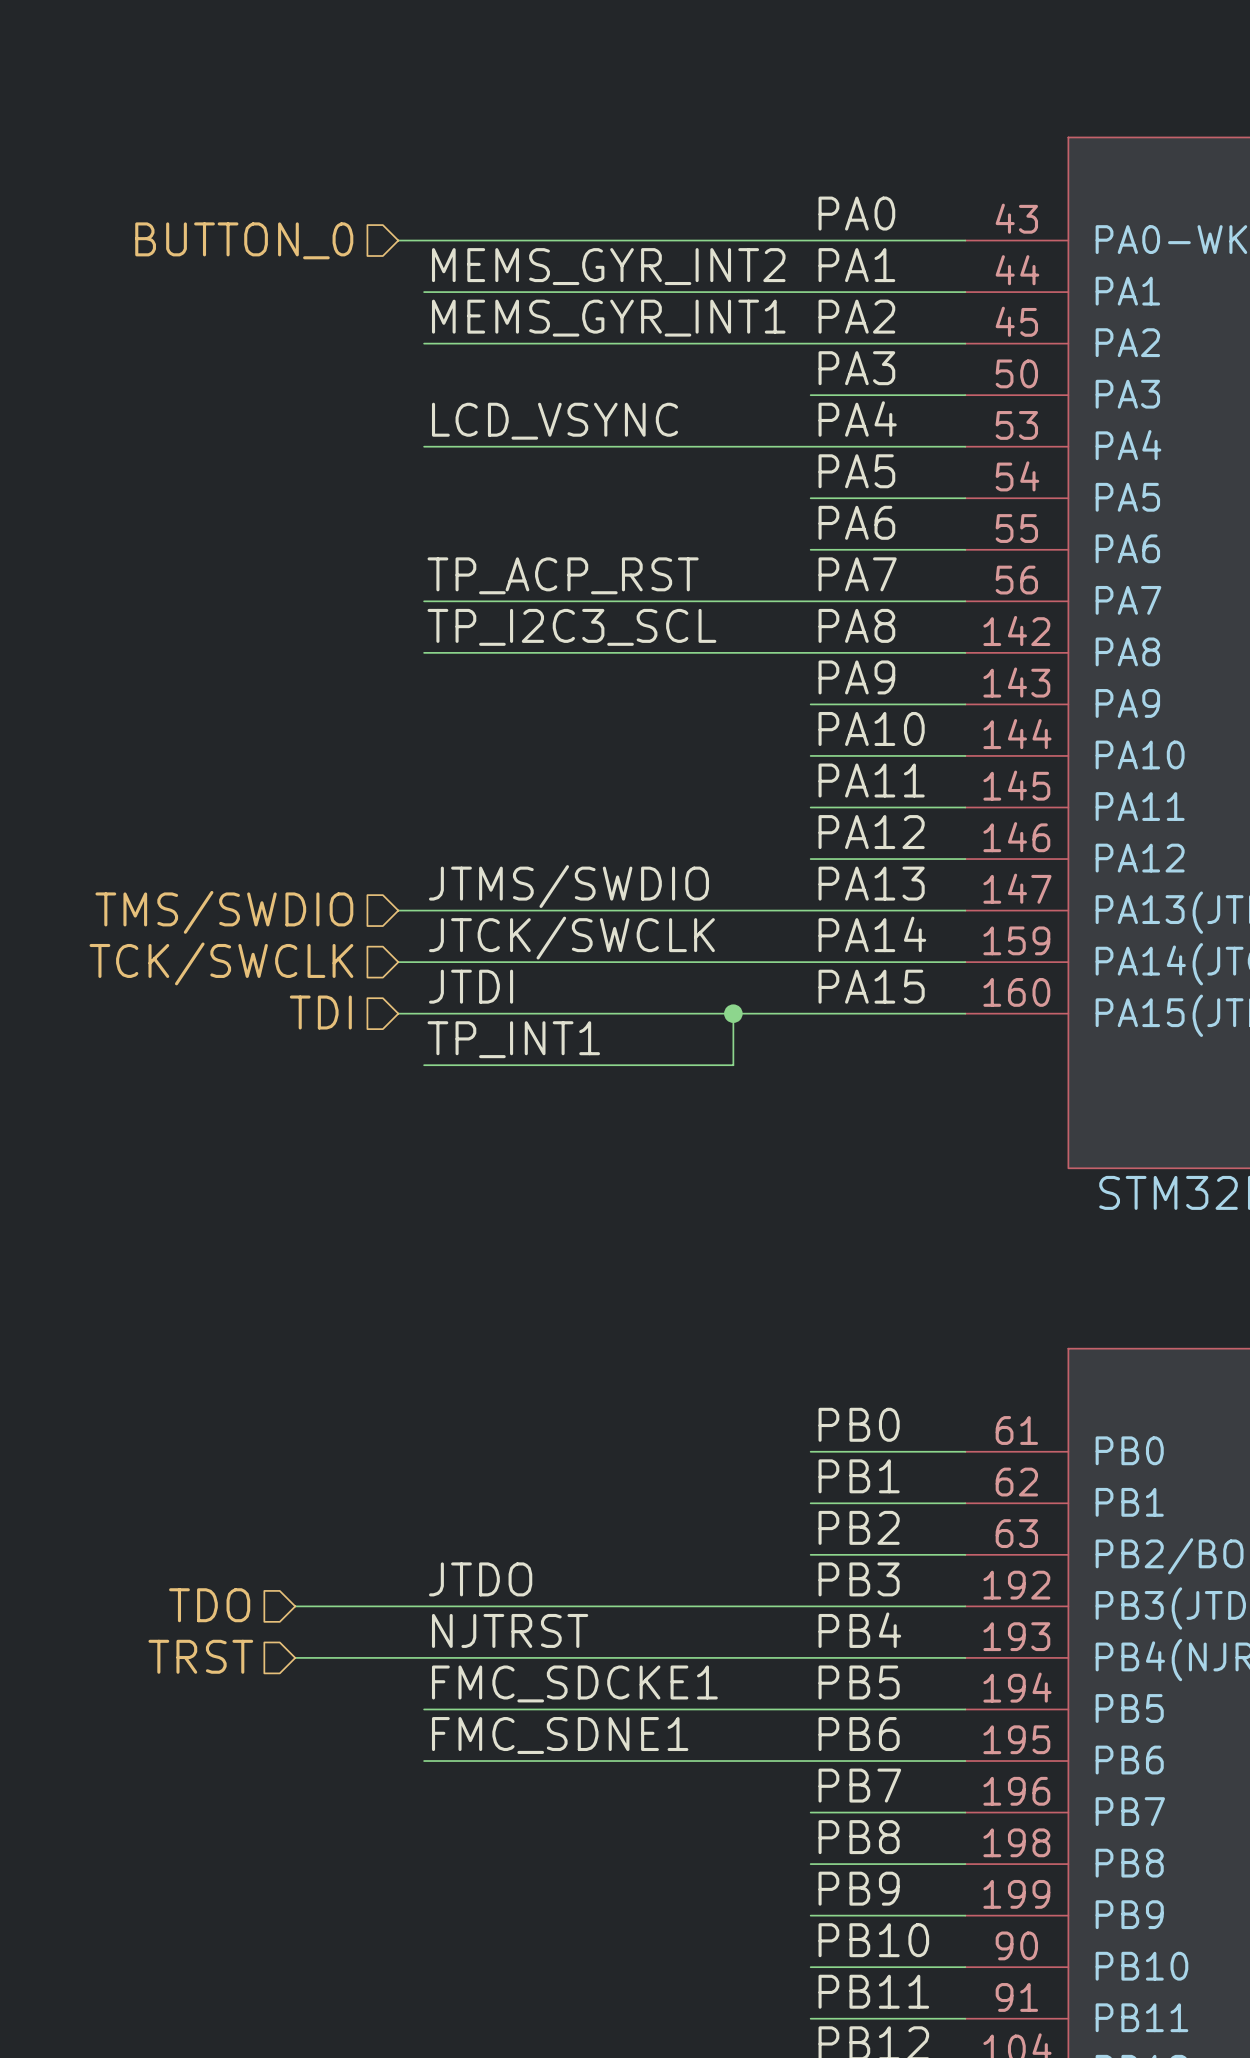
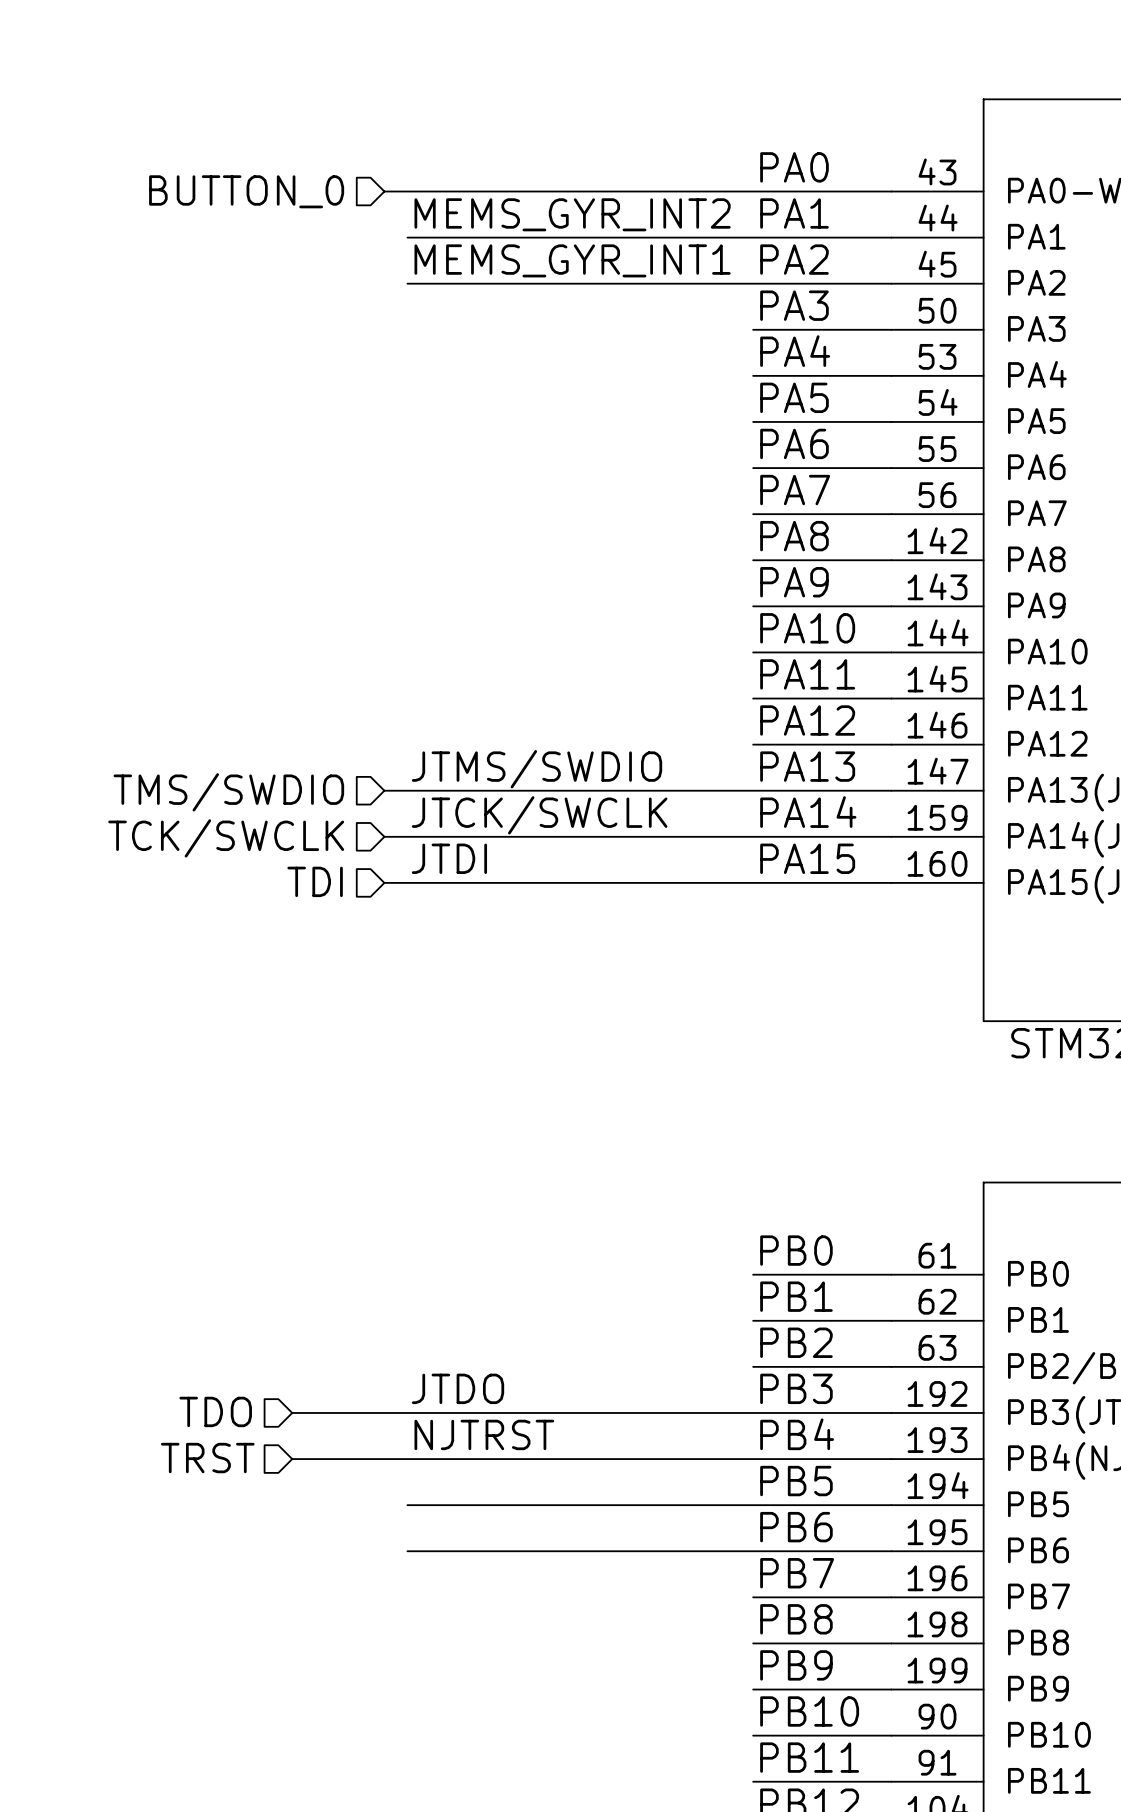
label: LCD_VSYNC (555, 421) -> none
wire: (424, 446) (810, 446) -> none
label: TP_ACP_RST (563, 575) -> none
wire: (424, 601) (810, 601) -> none
label: TP_I2C3_SCL (571, 627) -> none
wire: (424, 652) (810, 652) -> none
wire: (733, 1013) (733, 1065) (424, 1065) -> none
junction: (733, 1013) -> none
label: TP_INT1 (513, 1039) -> none
label: FMC_SDCKE1 (574, 1683) -> none
label: FMC_SDNE1 (560, 1735) -> none

